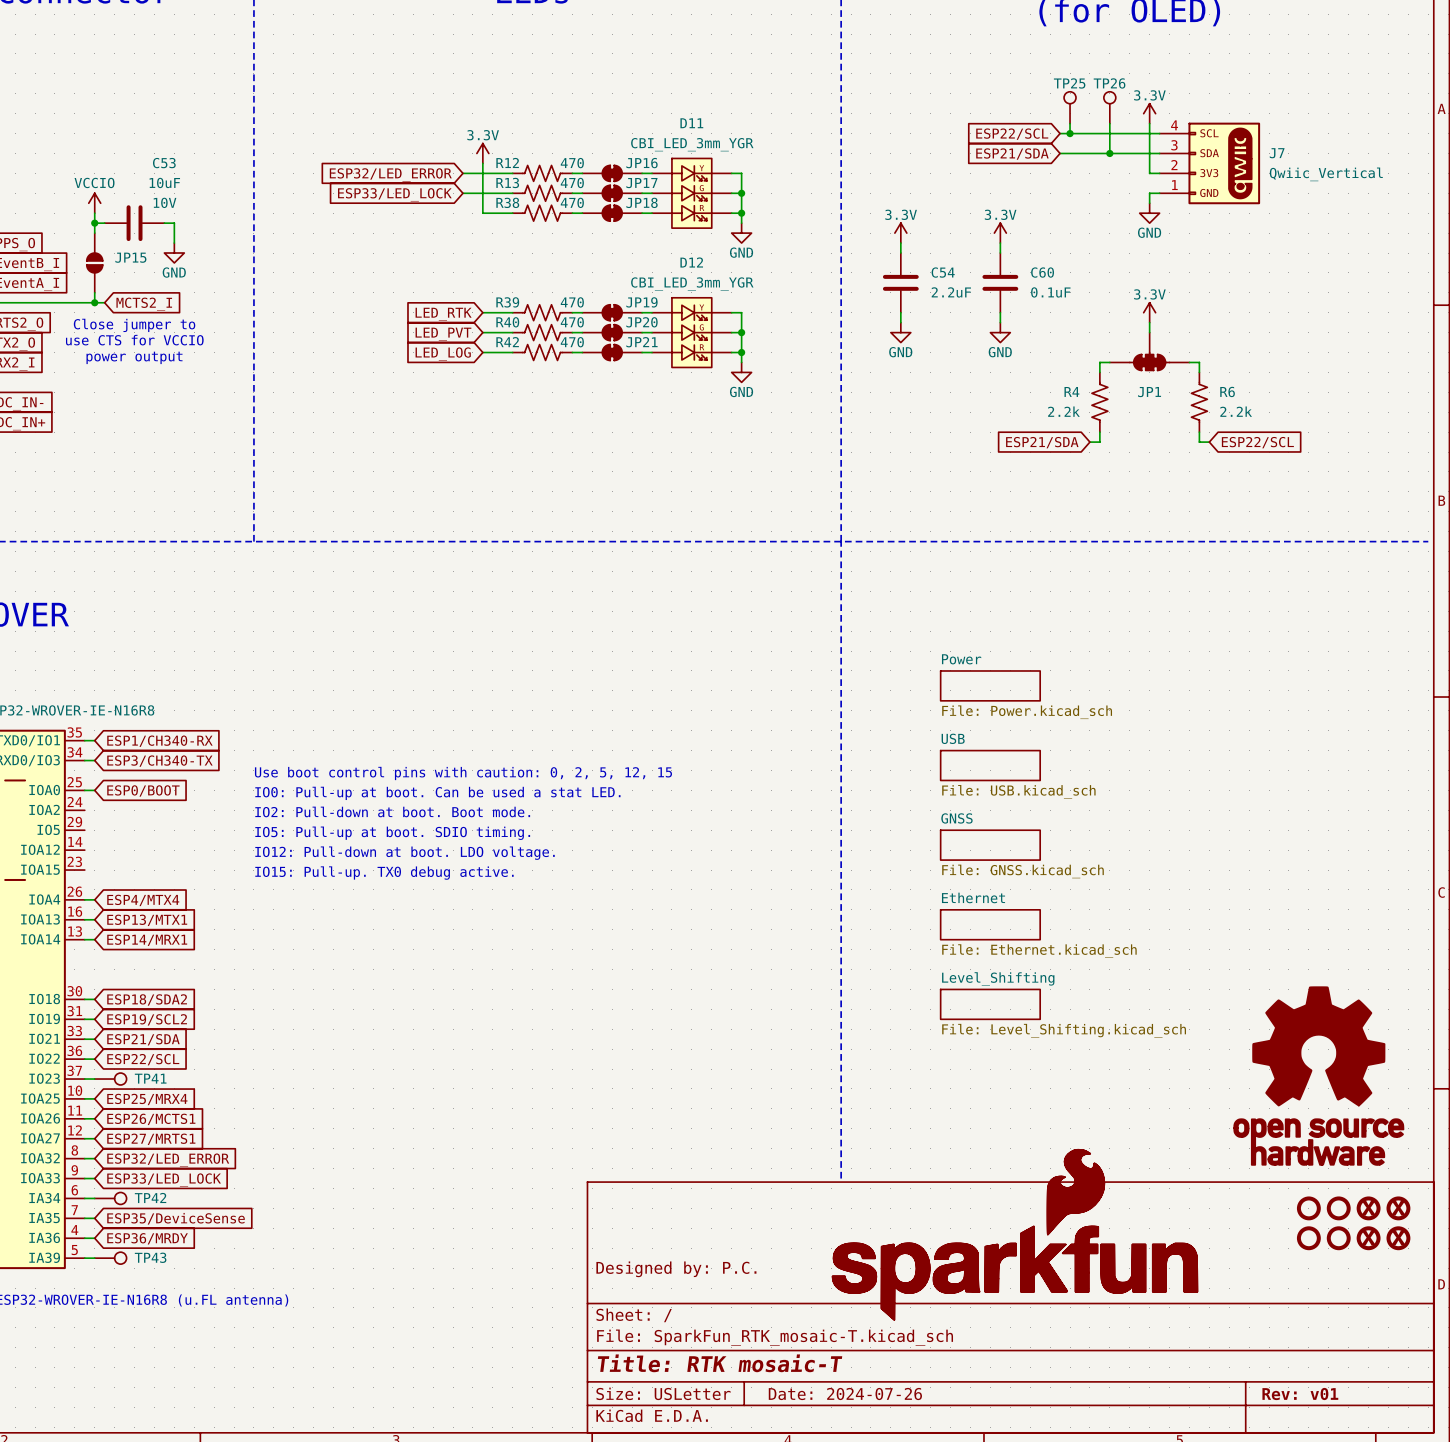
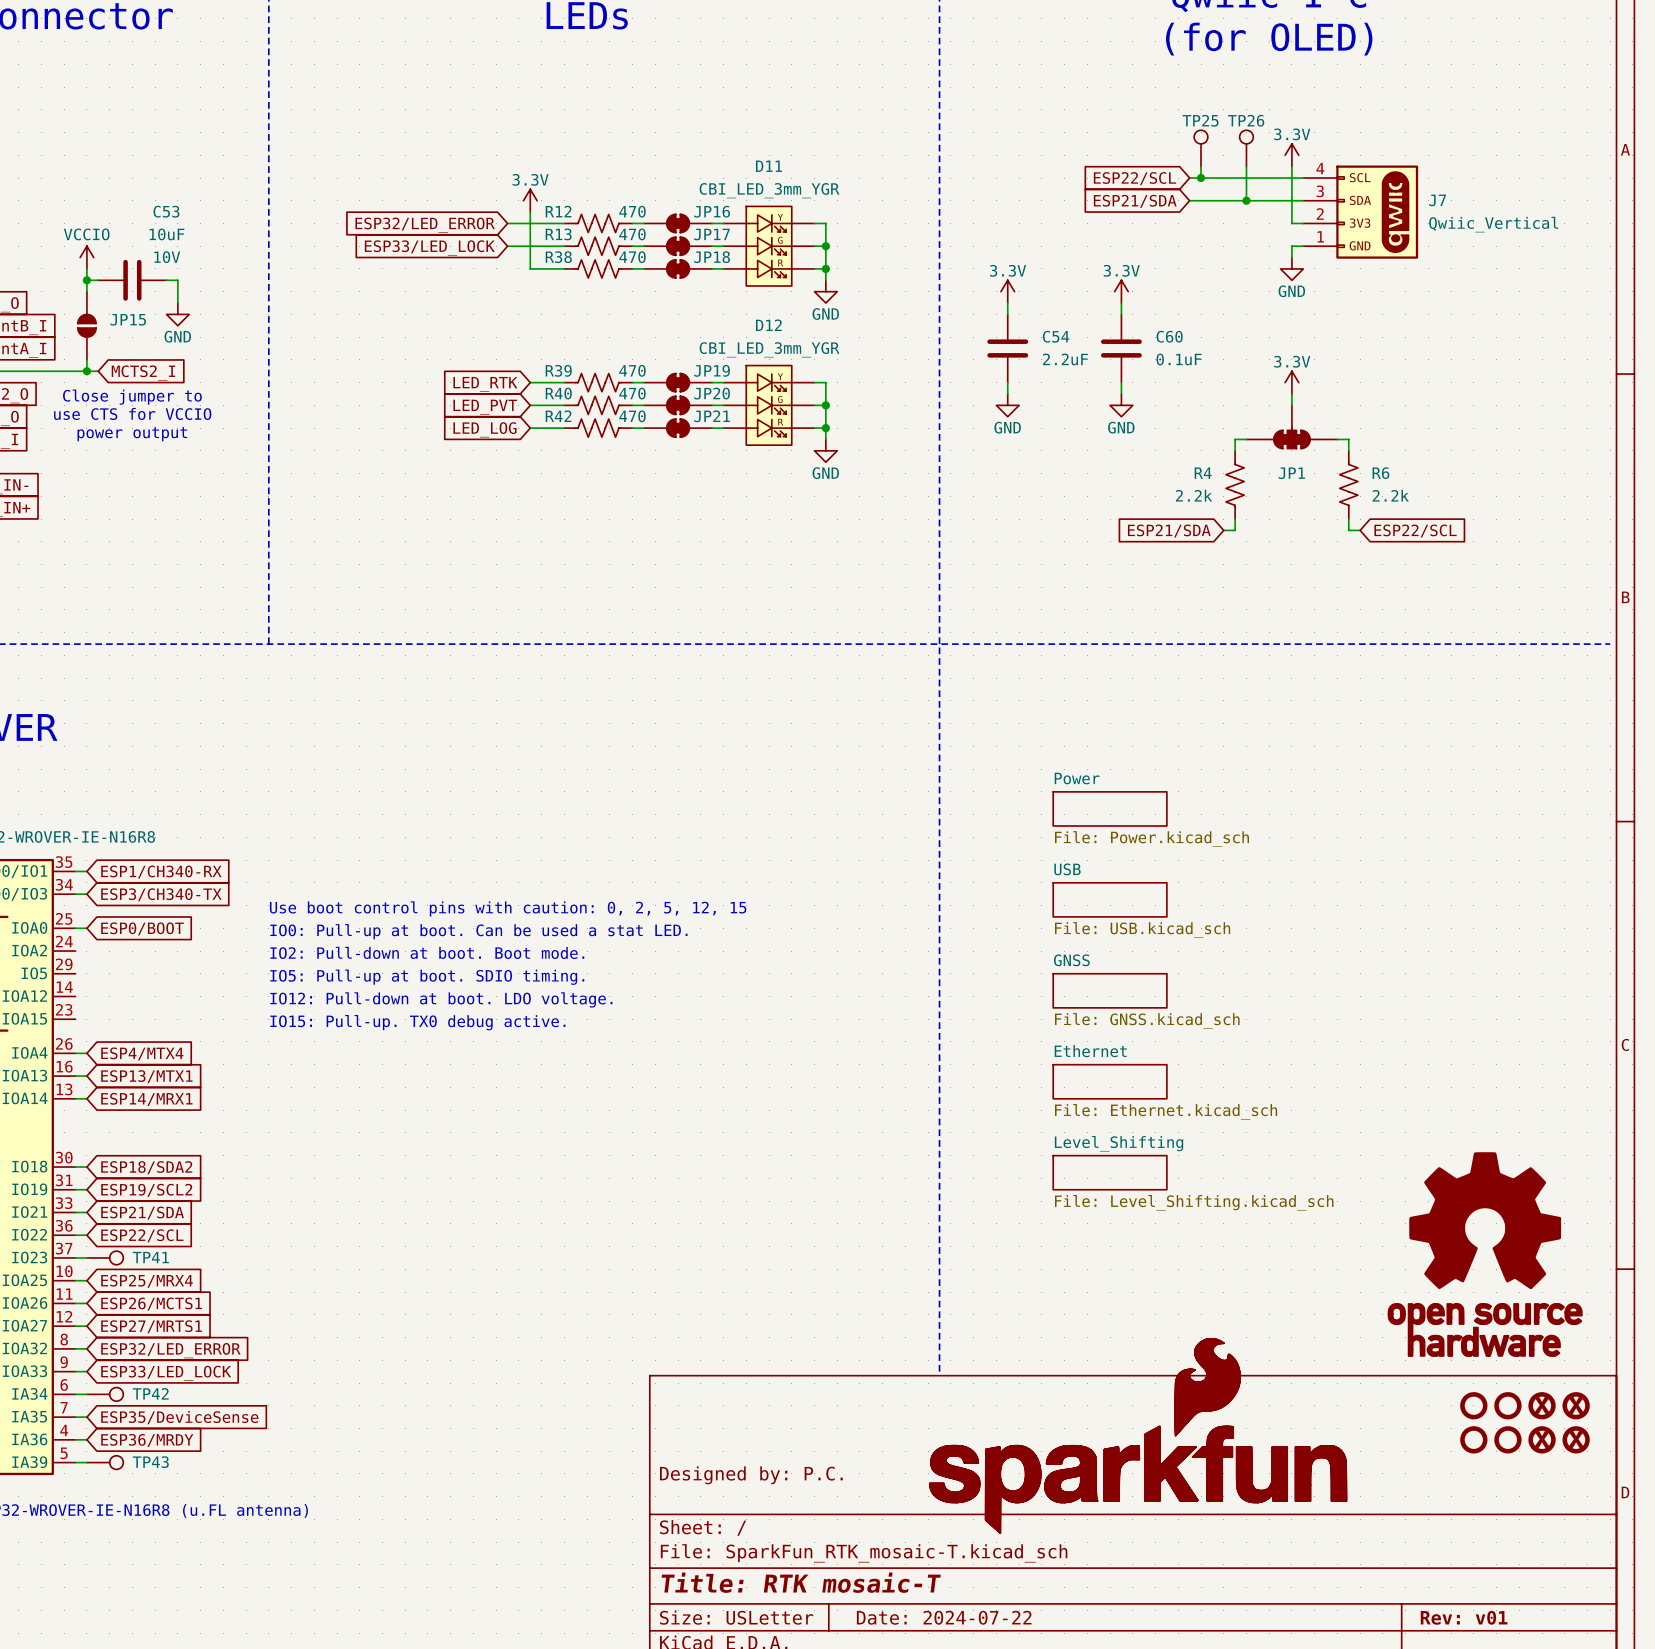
title block: Date: 2024-07-26 (845, 1394) -> Date: 2024-07-22 (944, 1617)

